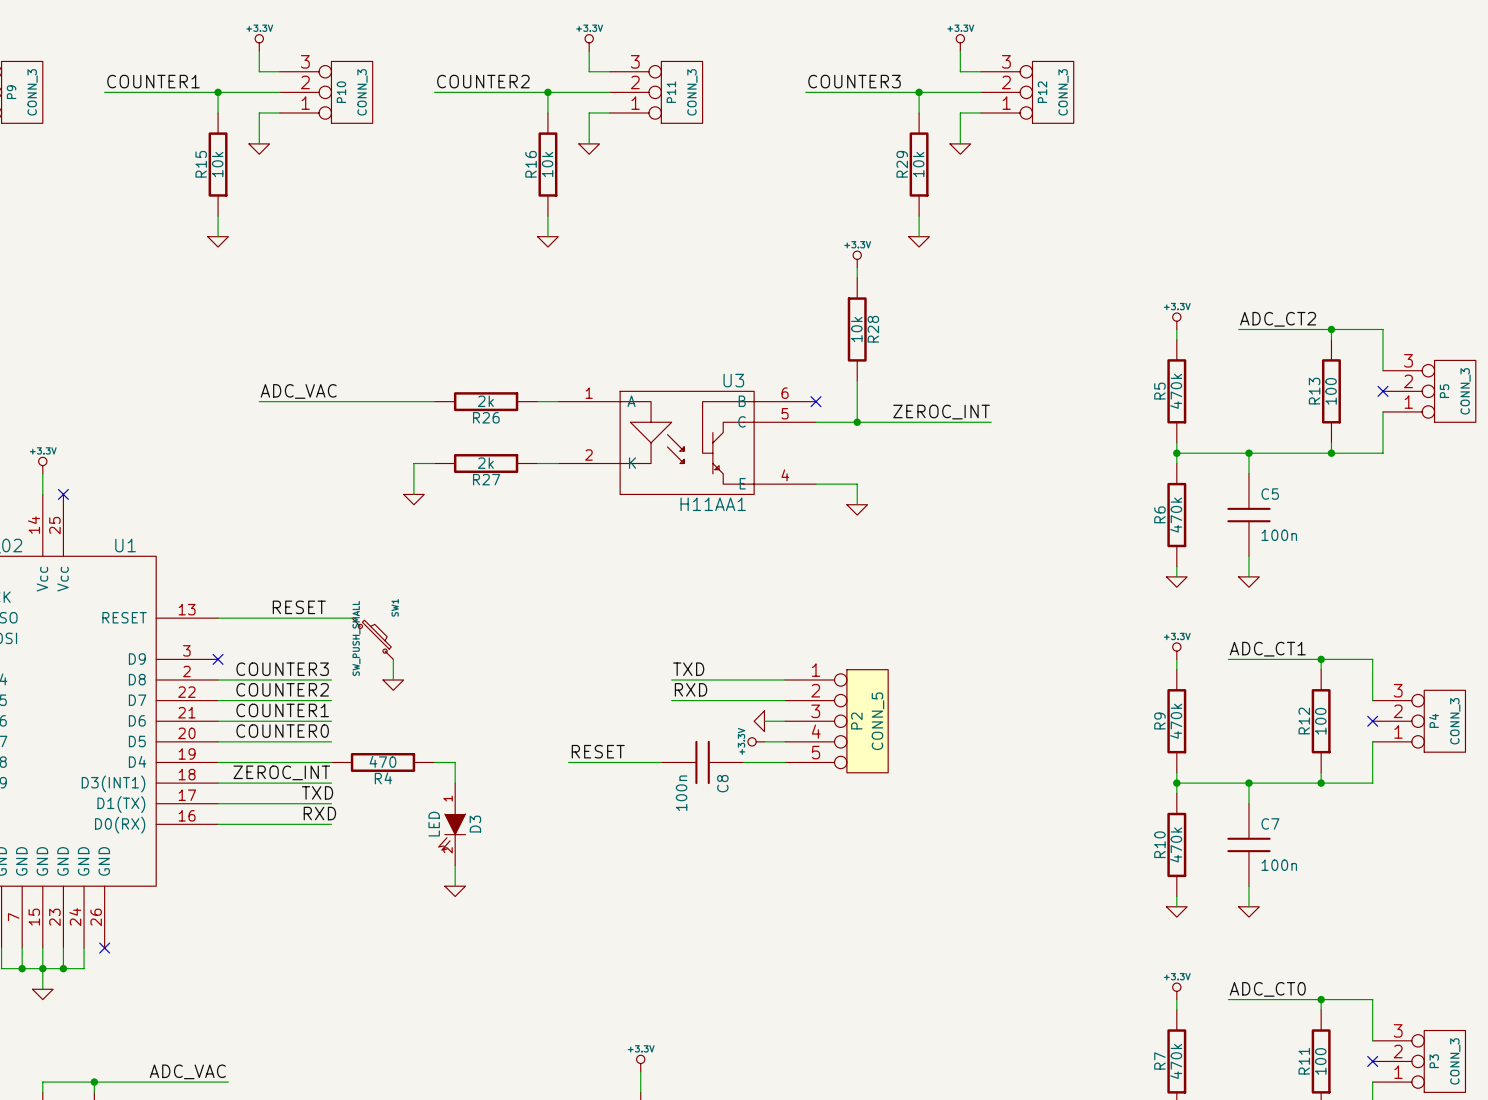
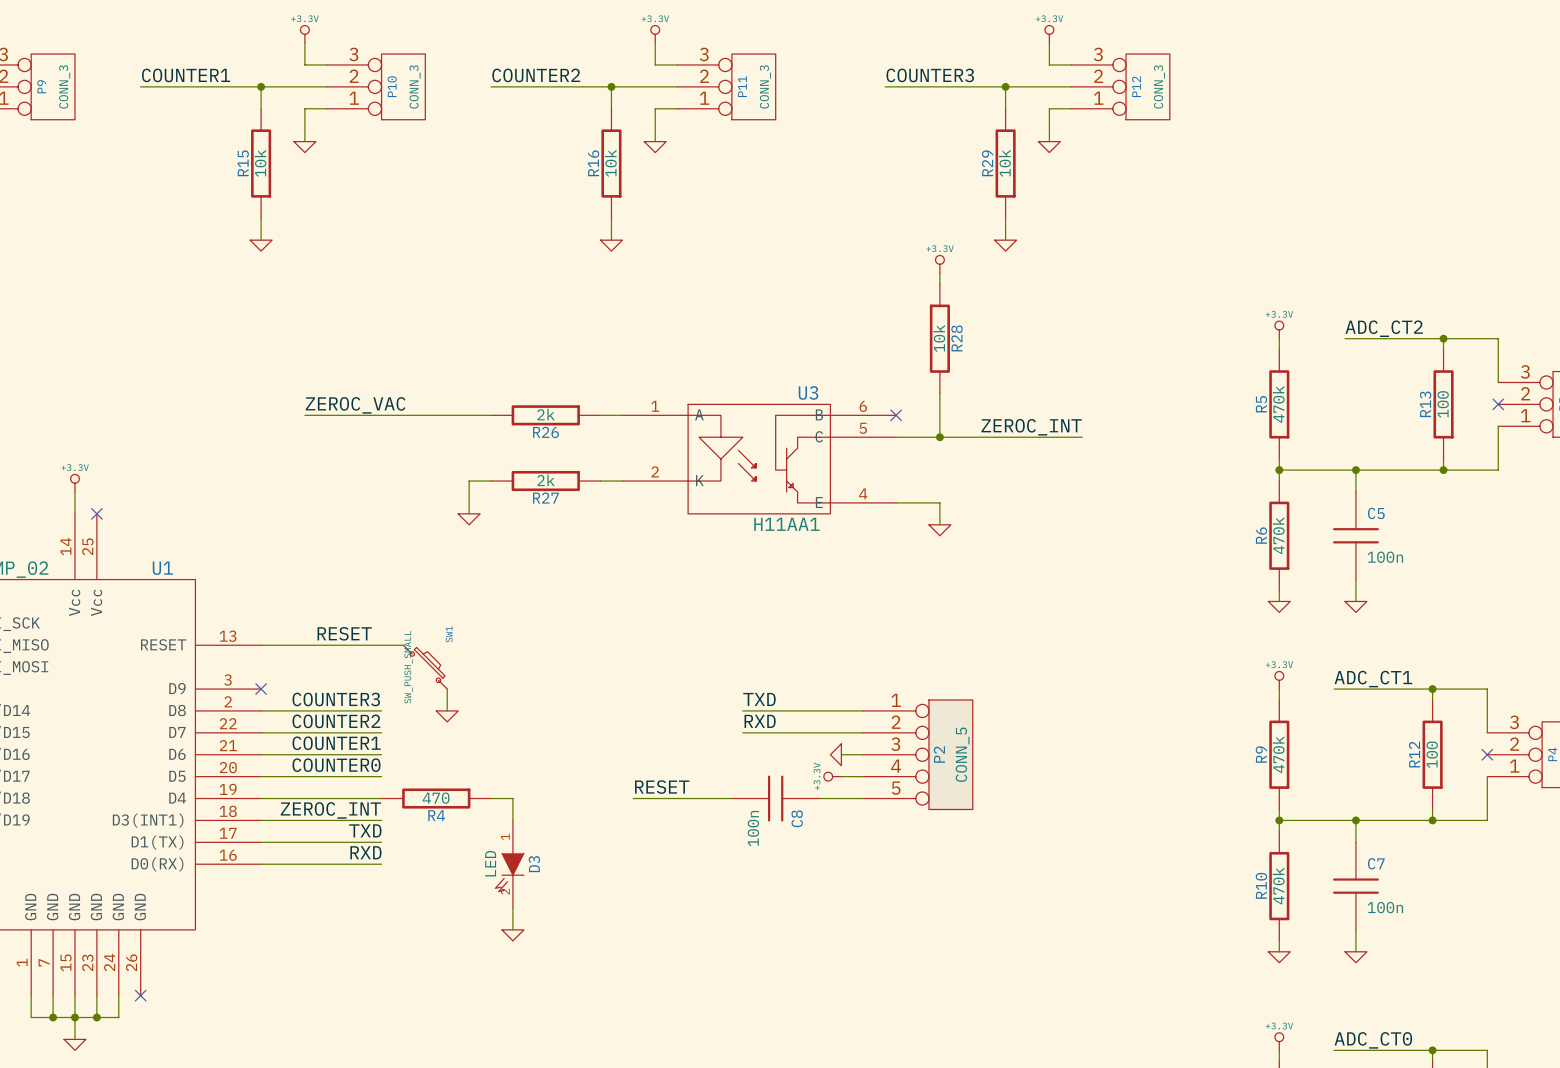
label: ADC_VAC (298, 391) -> ZEROC_VAC (355, 405)

